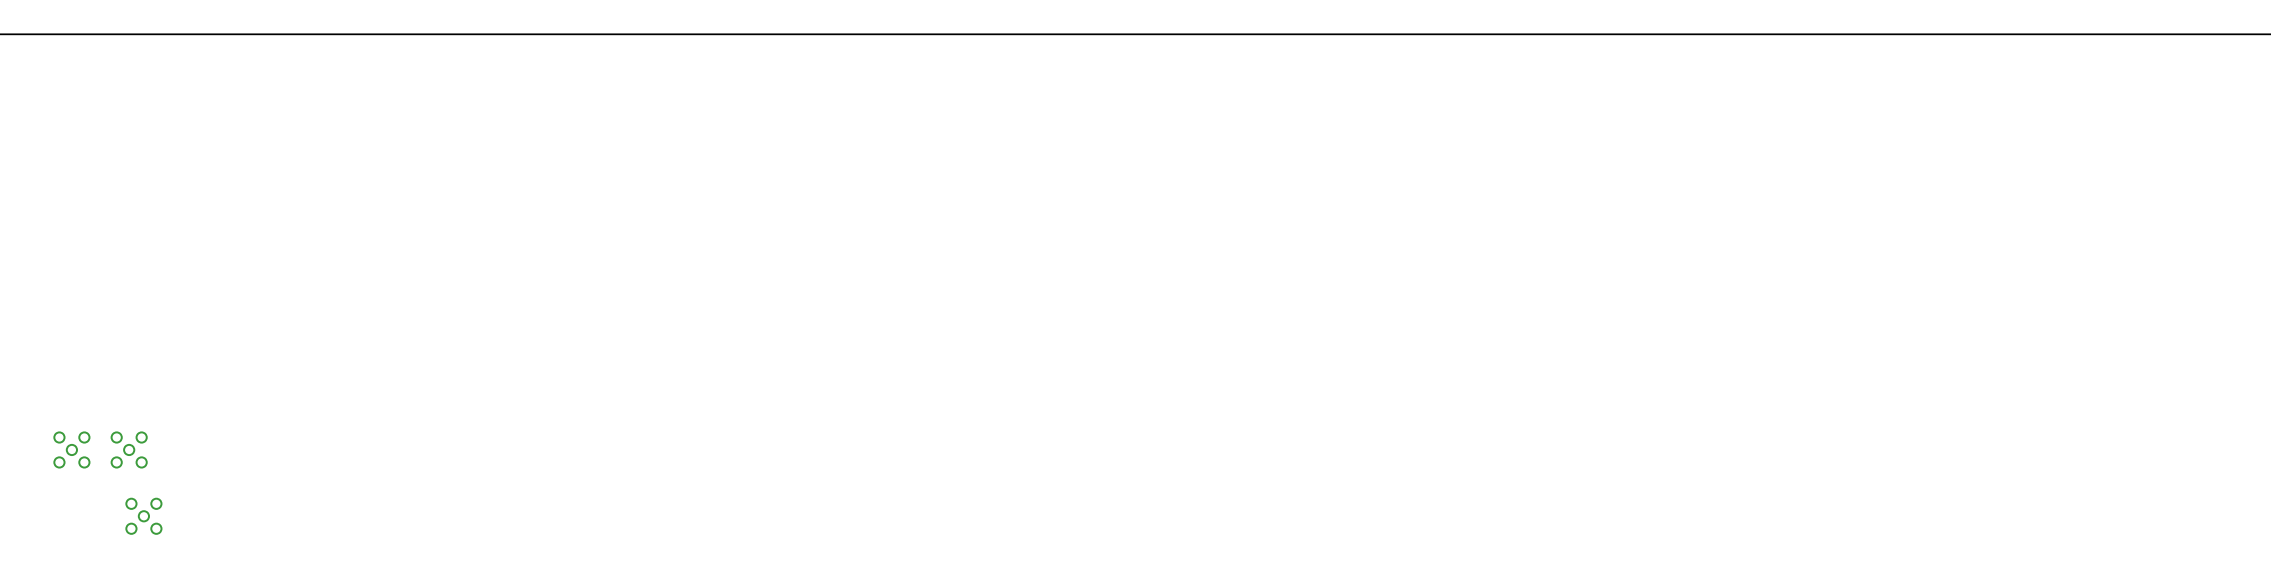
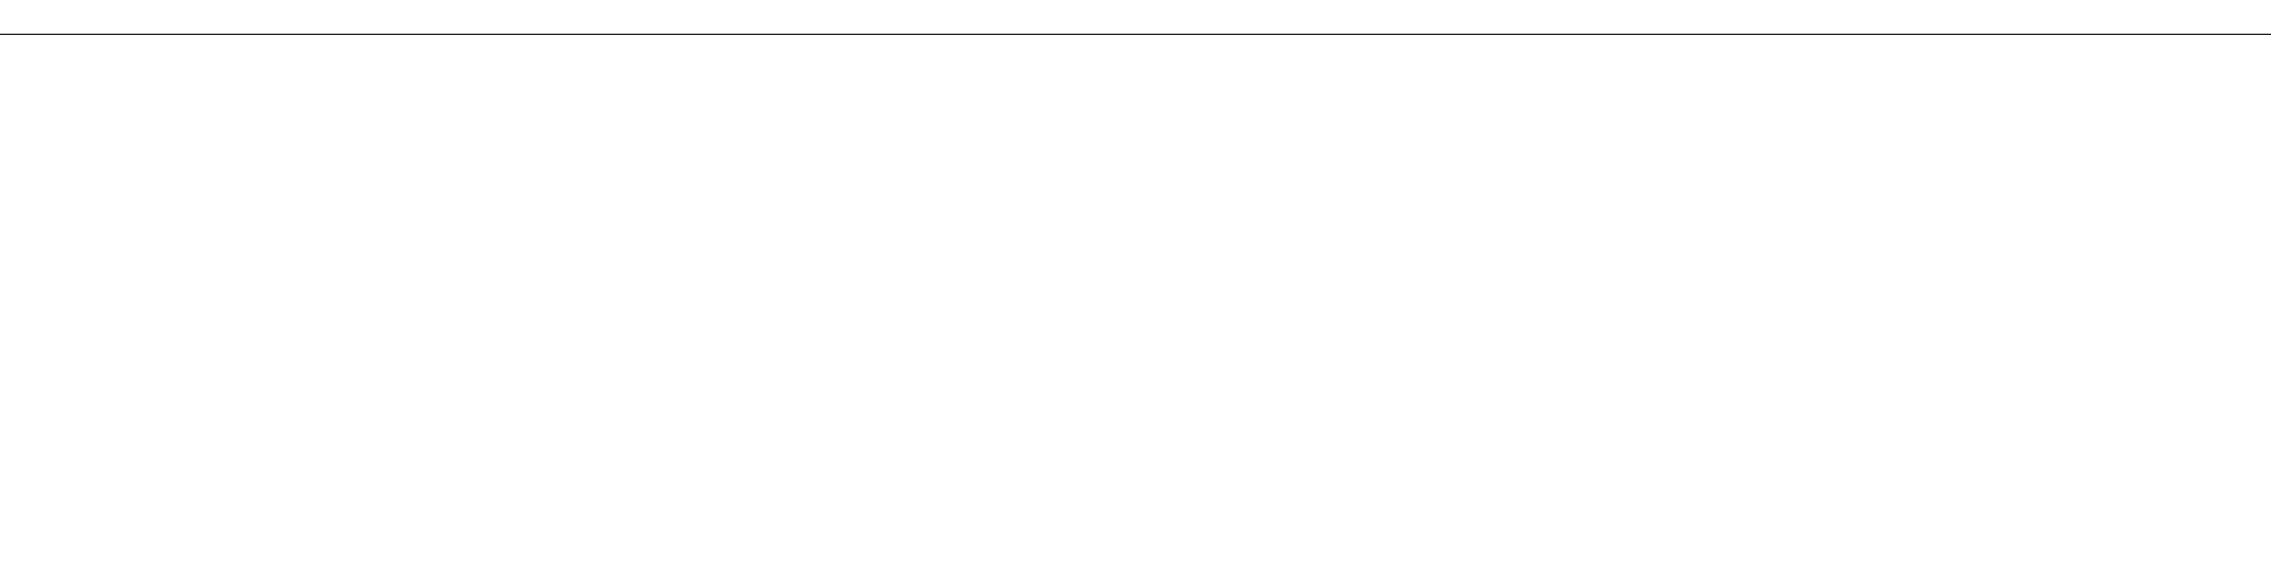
part: (71, 449) -> none
part: (129, 449) -> none
part: (143, 516) -> none

